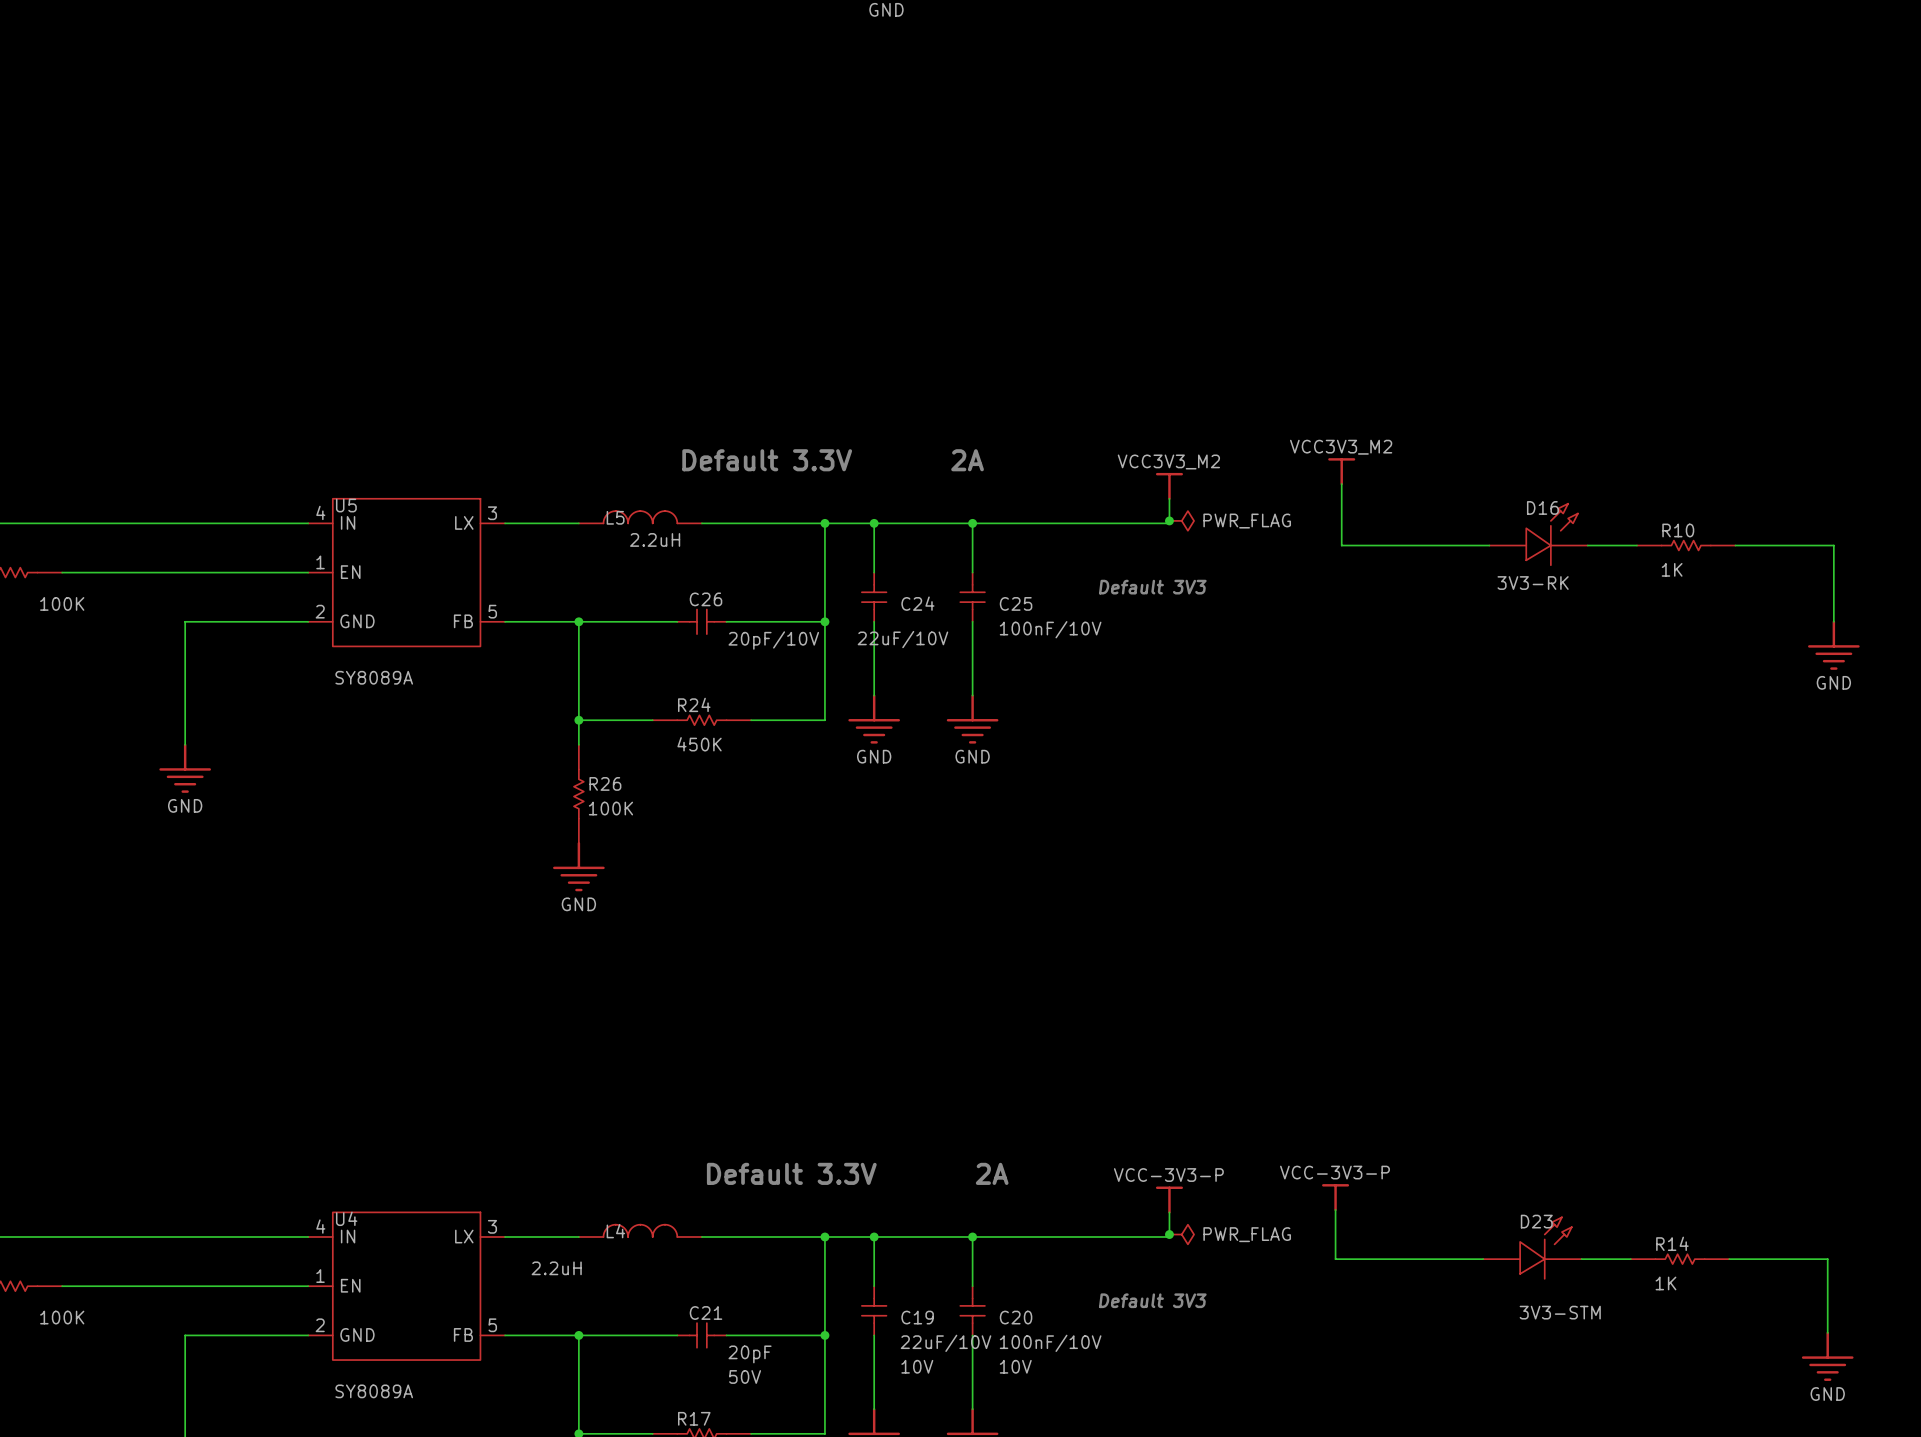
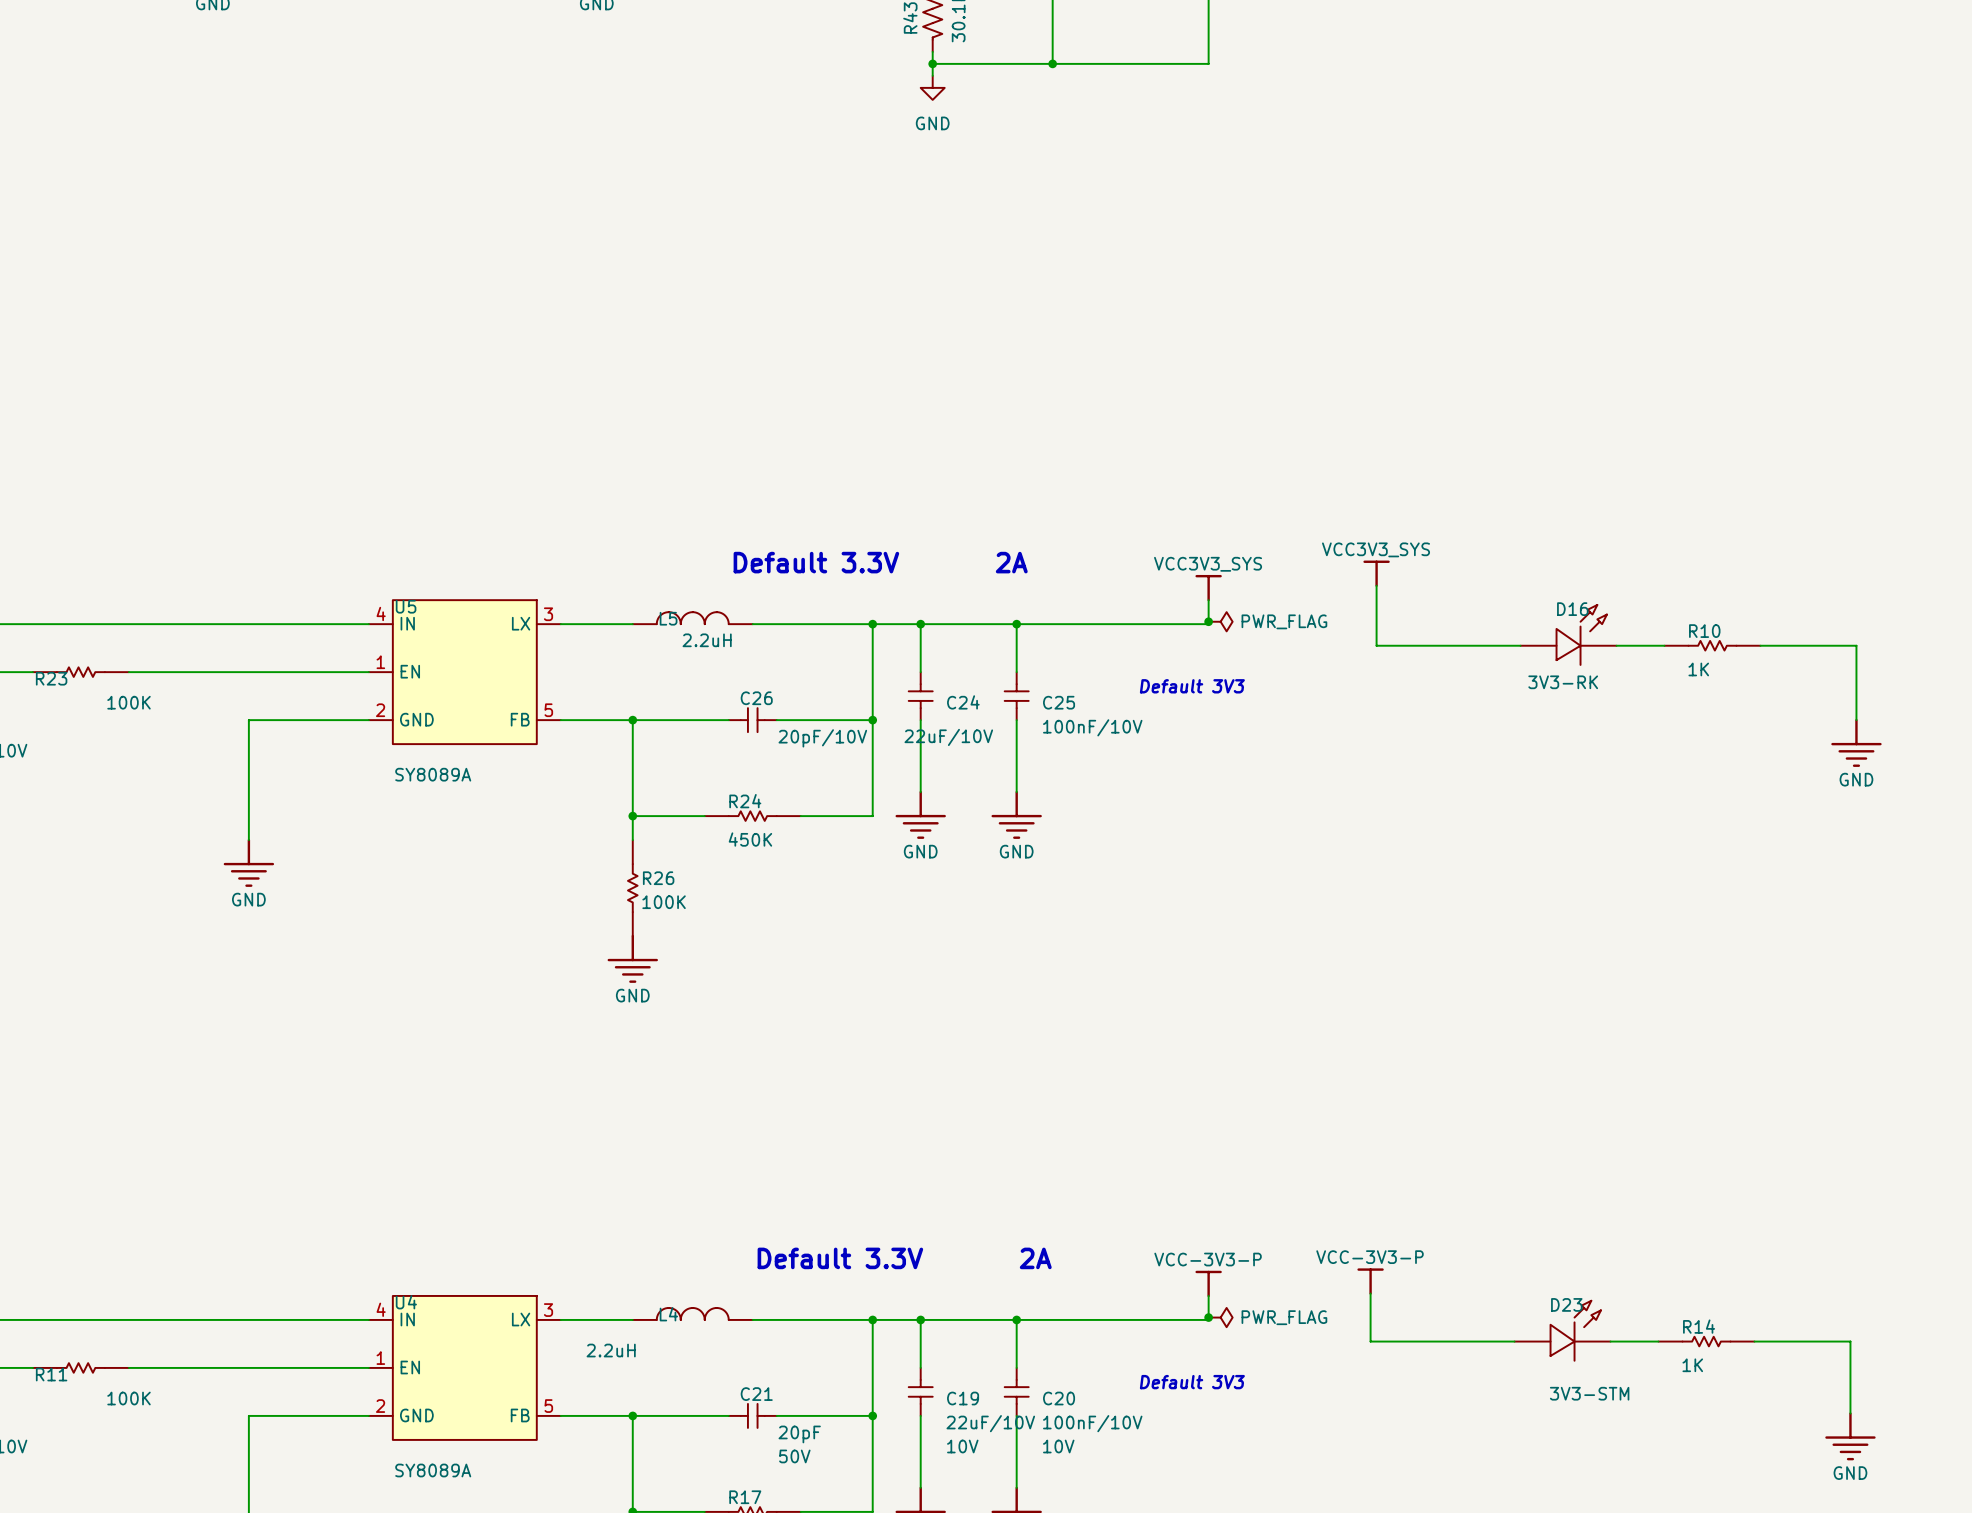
power symbol: VCC3V3_M2 (1341, 471) -> VCC3V3_SYS (1376, 573)
power symbol: VCC3V3_M2 (1169, 486) -> VCC3V3_SYS (1208, 588)

